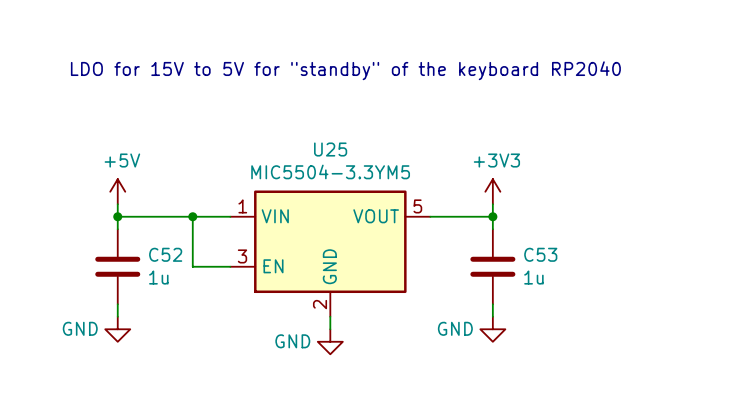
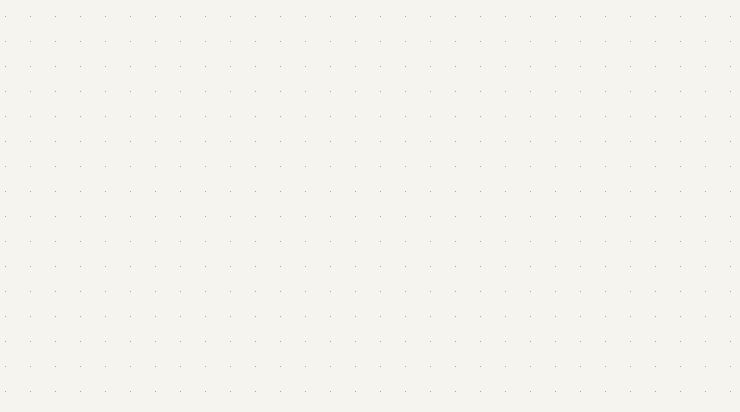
text: LDO for 15V to 5V for "standby" of the keyboard RP2040 (345, 70) -> none
power symbol: +5V (117, 191) -> none
power symbol: +3V3 (492, 191) -> none
wire: (117, 204) (117, 229) -> none
wire: (492, 204) (492, 229) -> none
wire: (117, 216) (230, 216) -> none
junction: (117, 216) -> none
wire: (192, 216) (192, 266) (230, 266) -> none
junction: (192, 216) -> none
wire: (430, 216) (492, 216) -> none
junction: (492, 216) -> none
U25: MIC5504-3.3YM5 (330, 253) -> none
C52: 1u (117, 266) -> none
C53: 1u (492, 266) -> none
wire: (117, 304) (117, 316) -> none
wire: (492, 304) (492, 316) -> none
wire: (330, 316) (330, 329) -> none
power symbol: GND (117, 329) -> none
power symbol: GND (492, 329) -> none
power symbol: GND (330, 341) -> none

